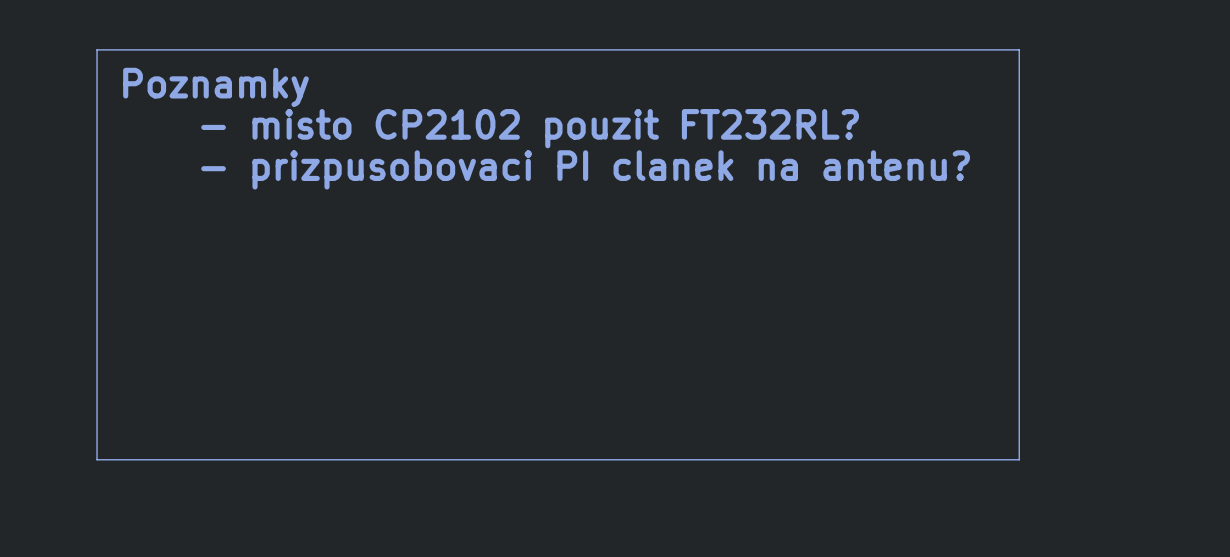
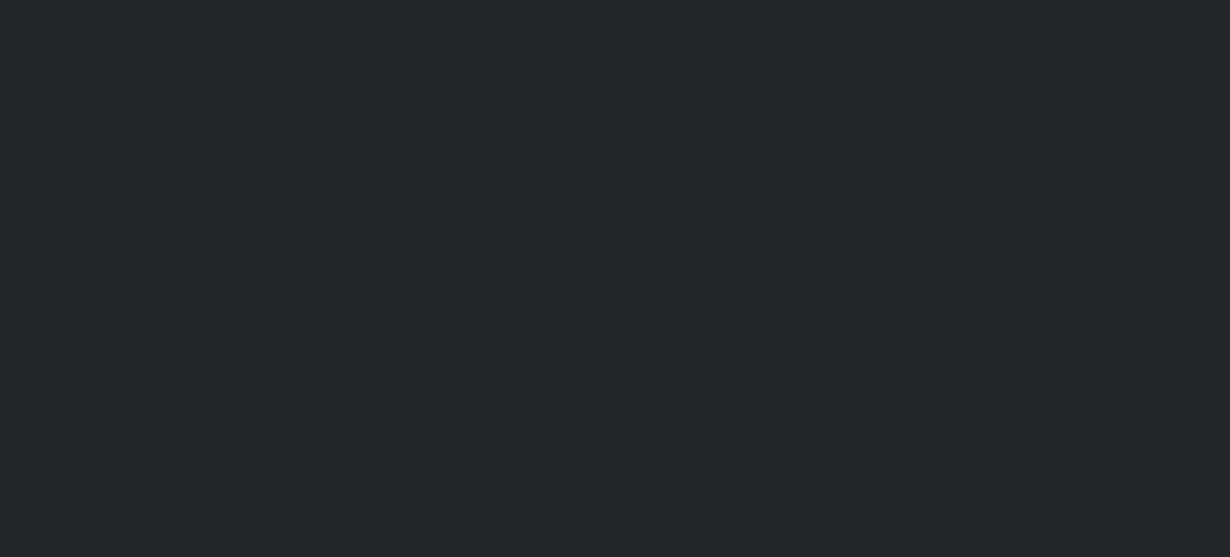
line: (97, 49) (1019, 49) (1019, 459) (97, 459) (97, 49) -> none
text: Poznamky (215, 87) -> none
text: - misto CP2102 pouzit FT232RL? (530, 128) -> none
text: - prizpusobovaci PI clanek na antenu? (585, 169) -> none

